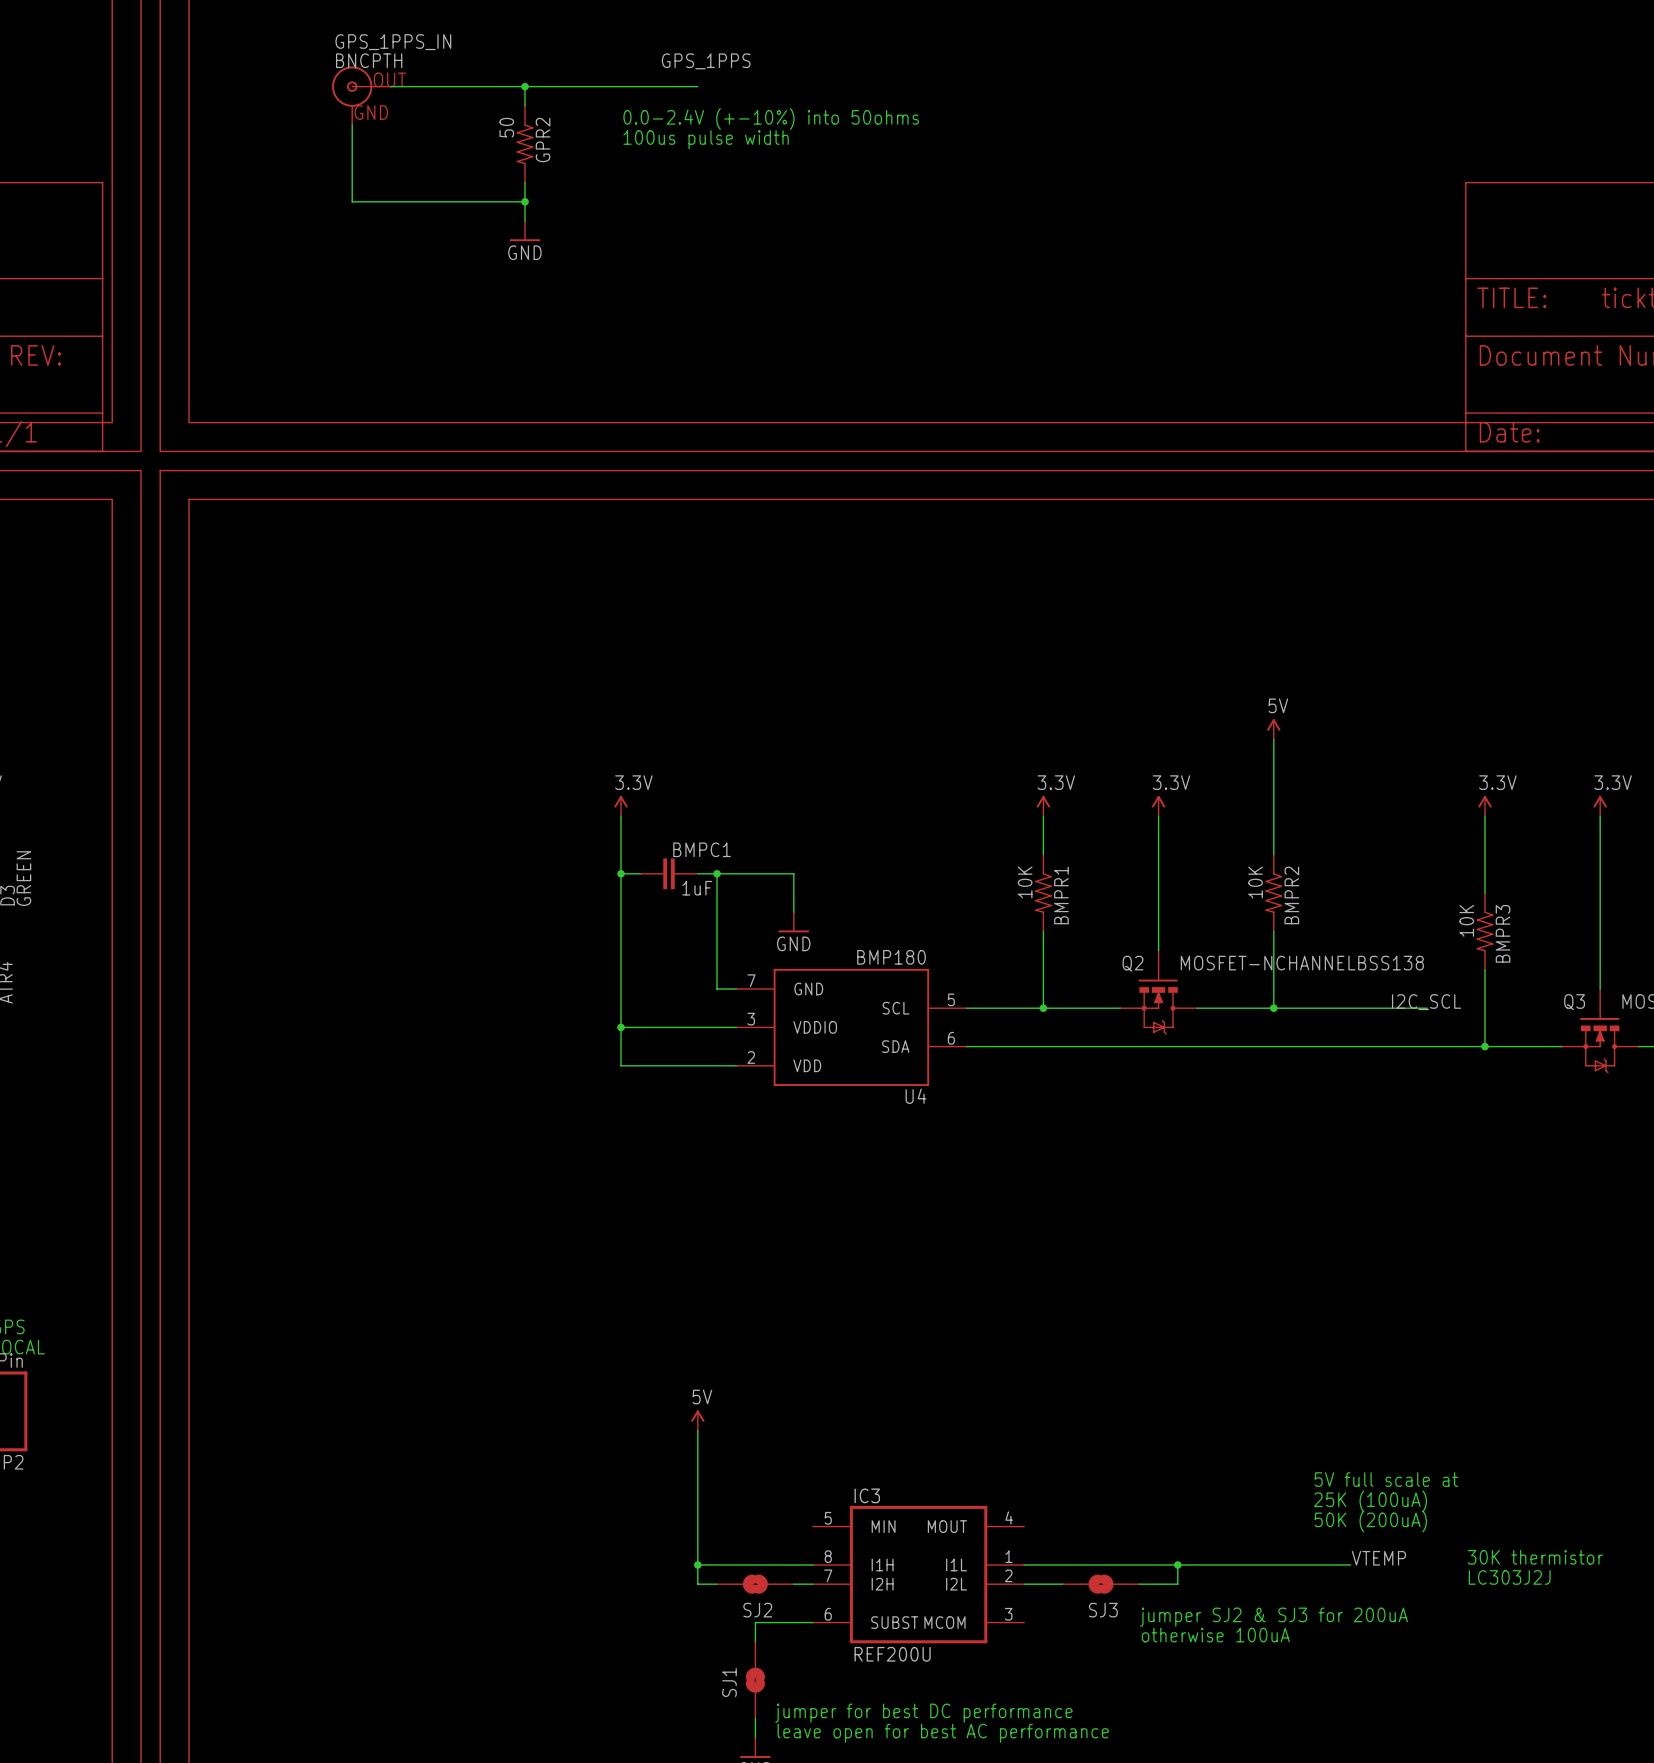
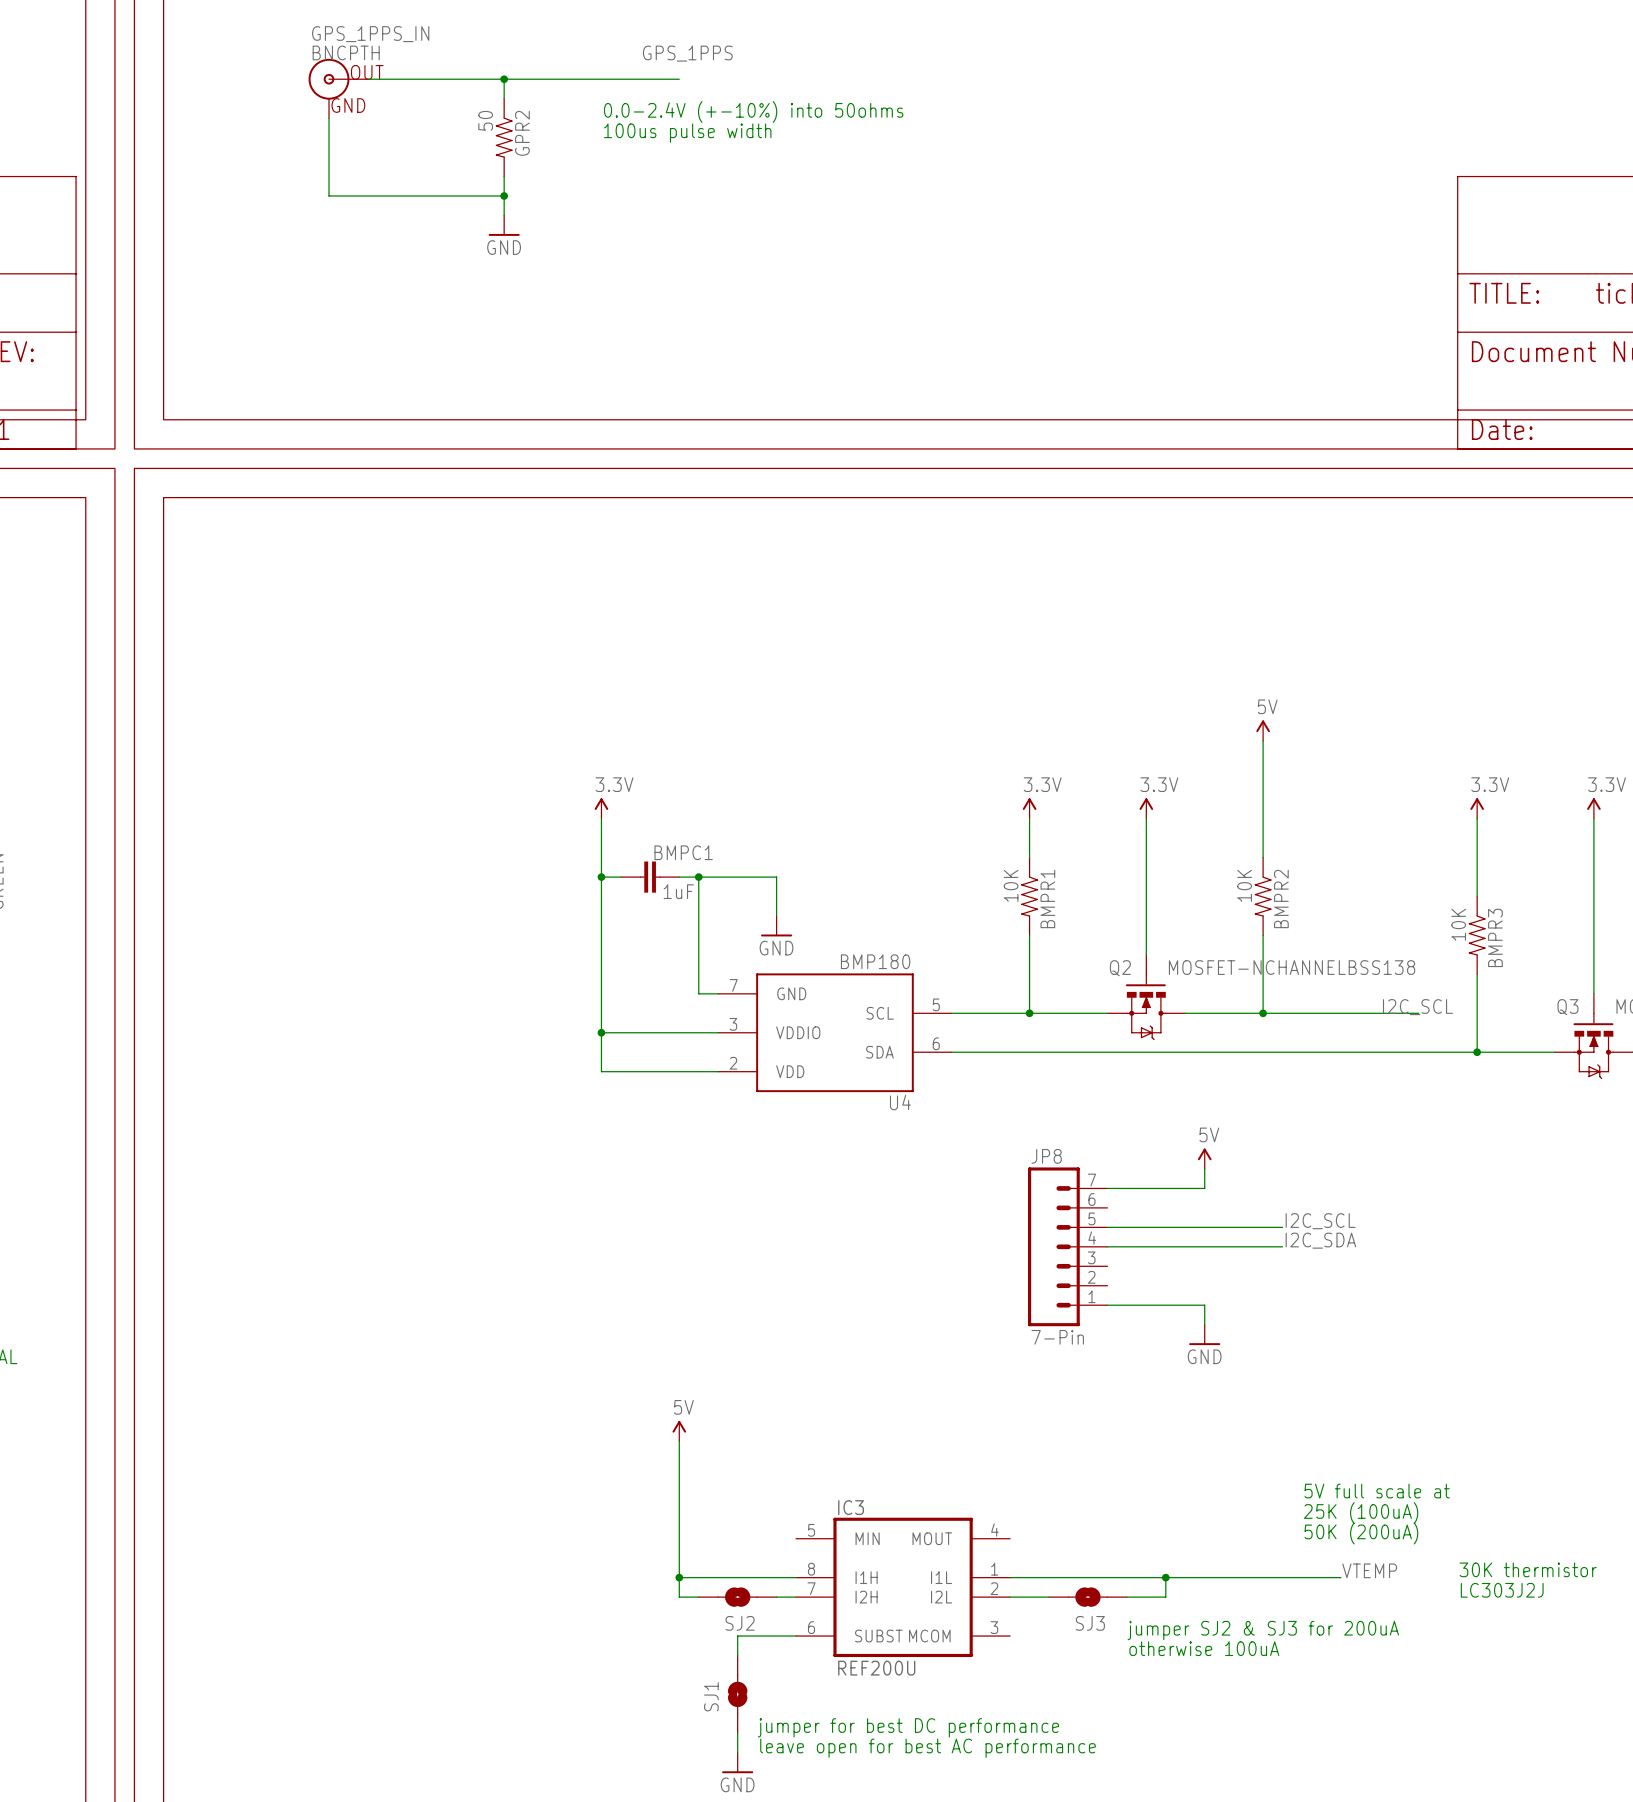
power symbol: none -> 5V (1204, 1158)
wire: none -> (1204, 1168) (1204, 1188) (1107, 1188)
label: none -> I2C_SCL (1320, 1221)
wire: none -> (1107, 1227) (1282, 1227)
label: none -> I2C_SDA (1320, 1240)
JP8: none -> 7-Pin (1067, 1246)
wire: none -> (1107, 1246) (1282, 1246)
wire: none -> (1107, 1305) (1204, 1305) (1204, 1324)
power symbol: none -> GND (1204, 1334)

